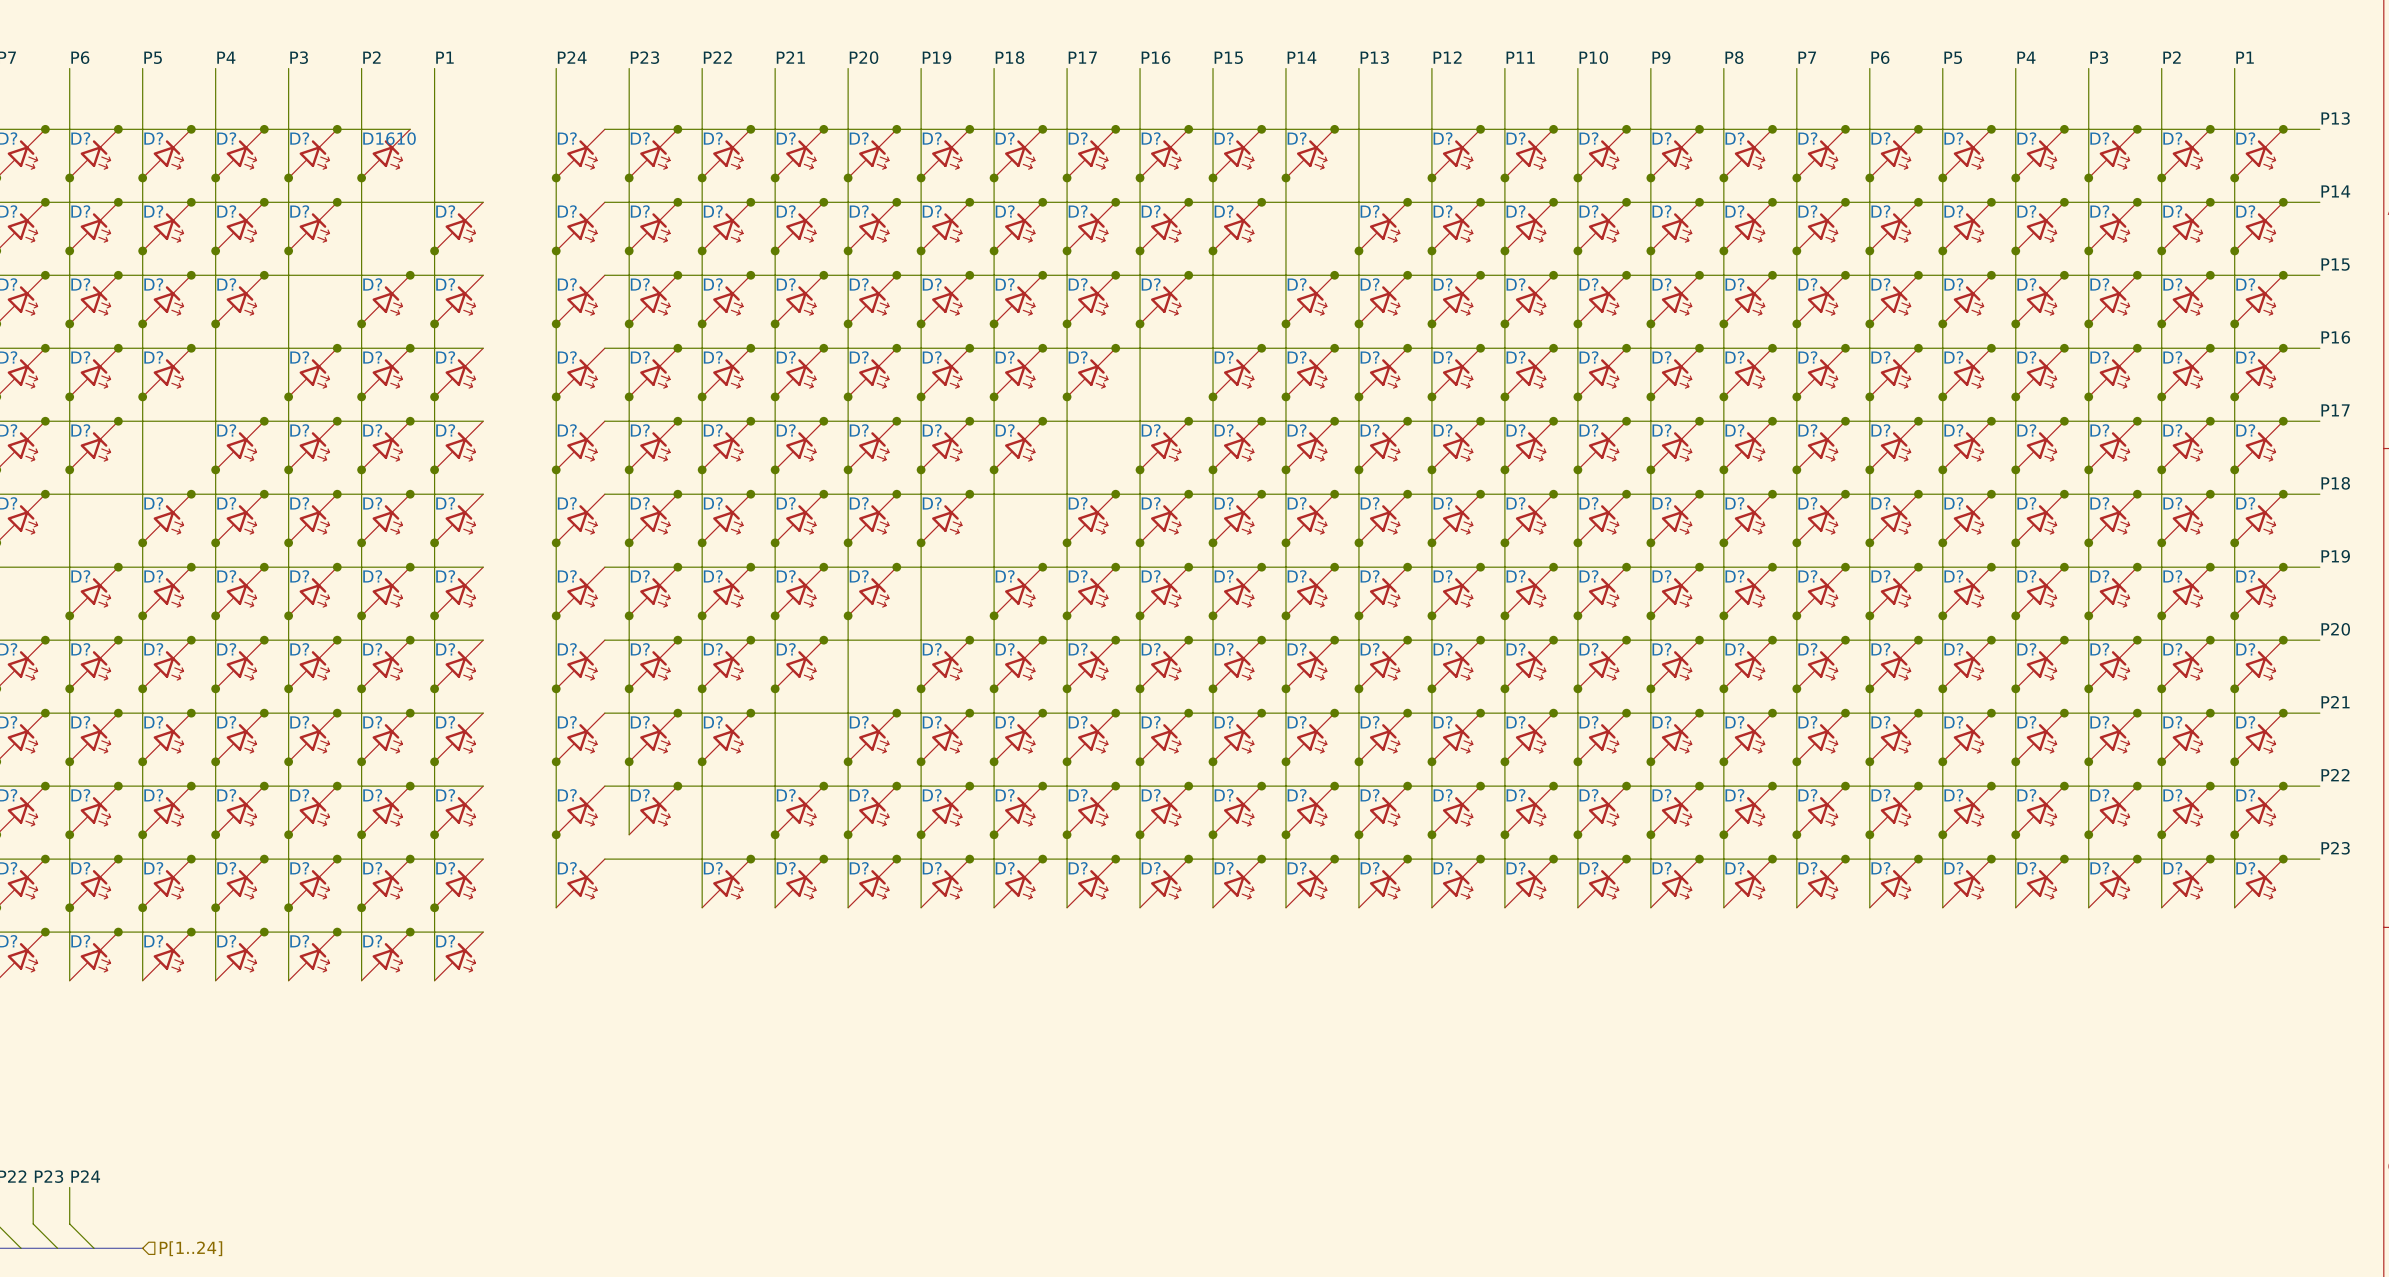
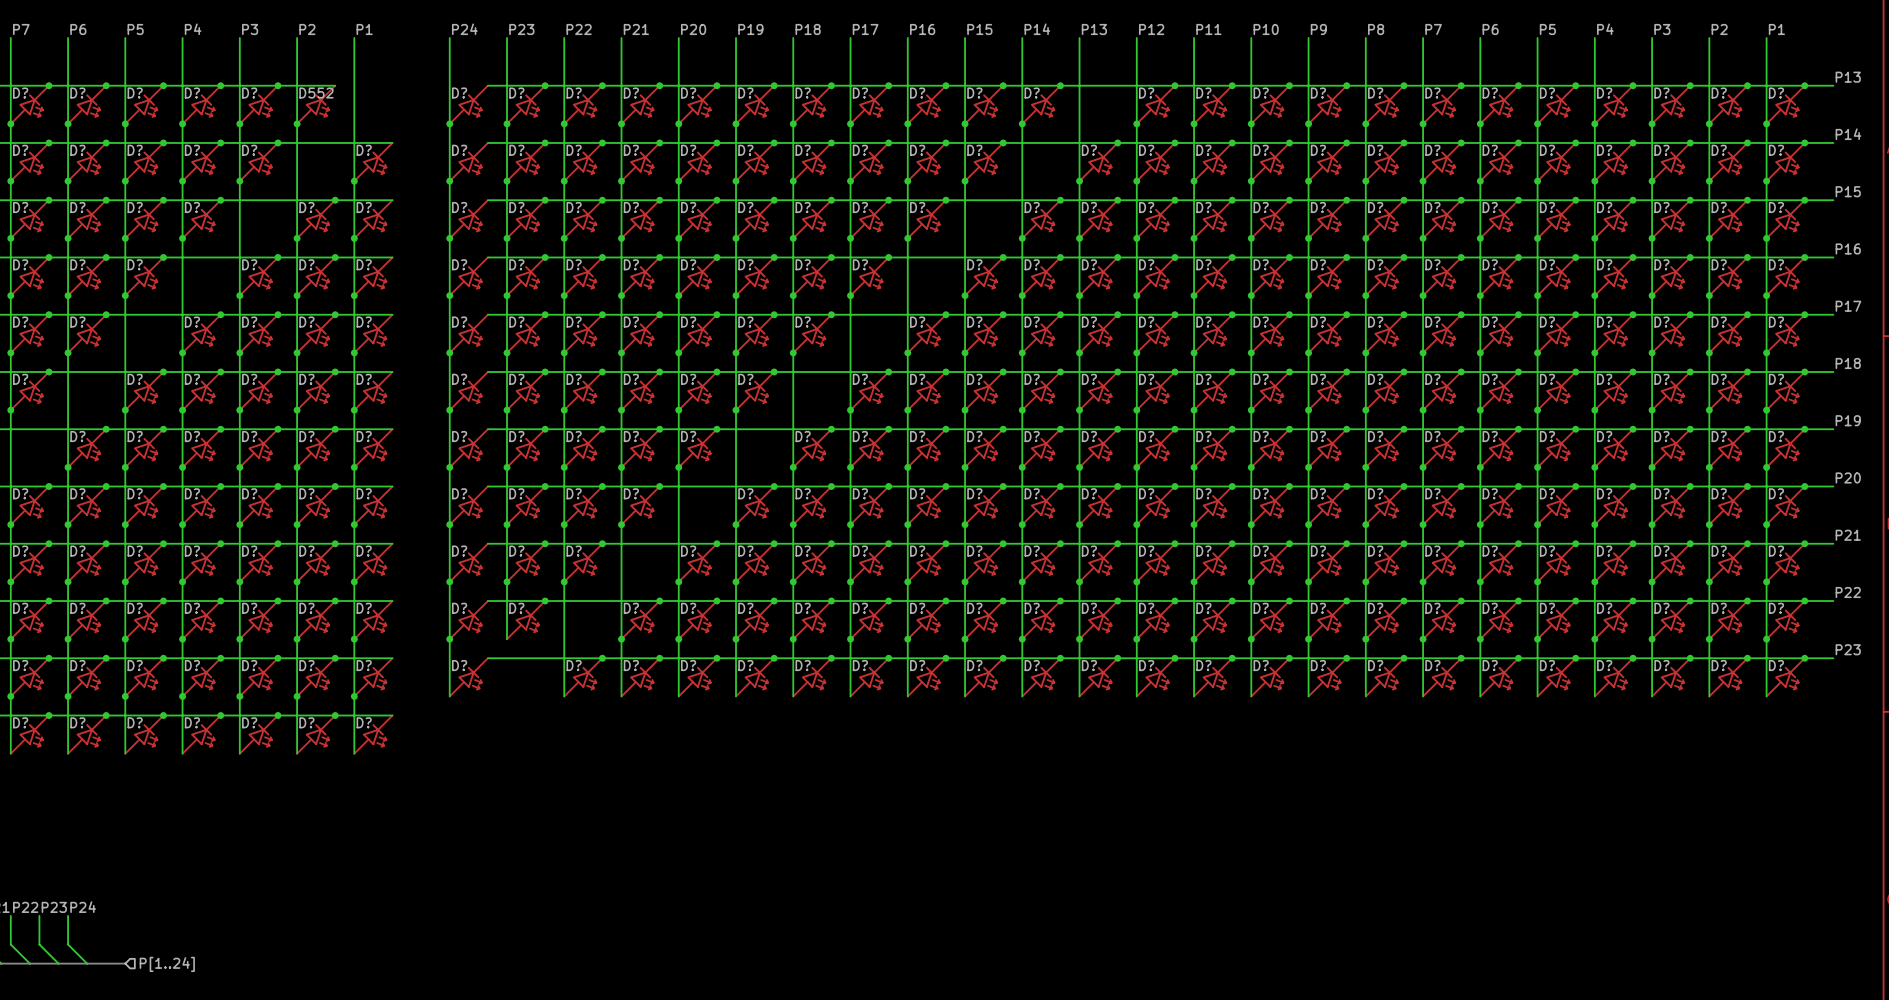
D1610 name: D1610 (389, 138) -> D552 (316, 92)

